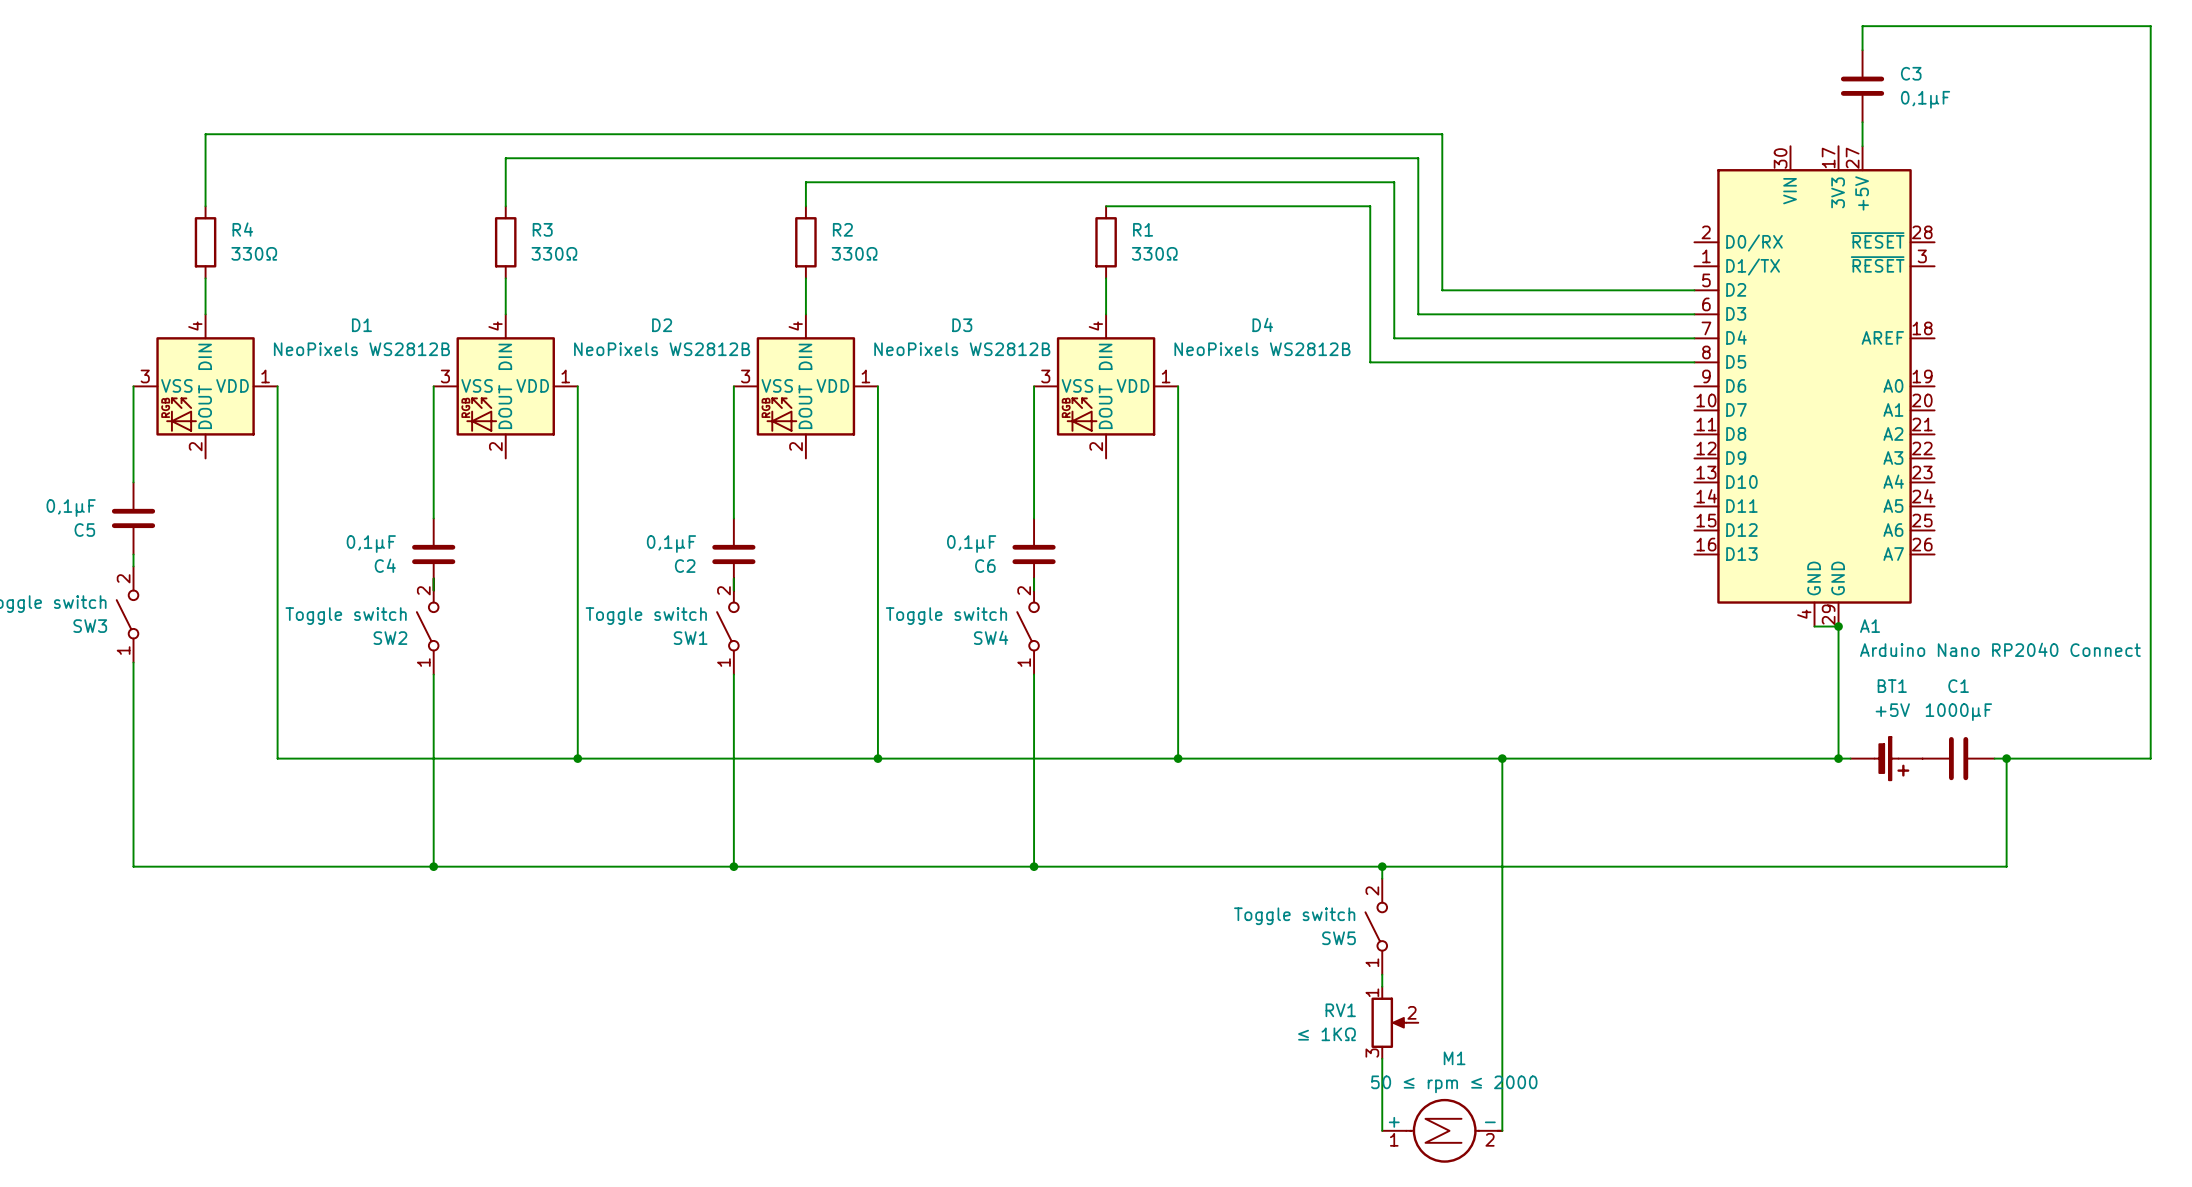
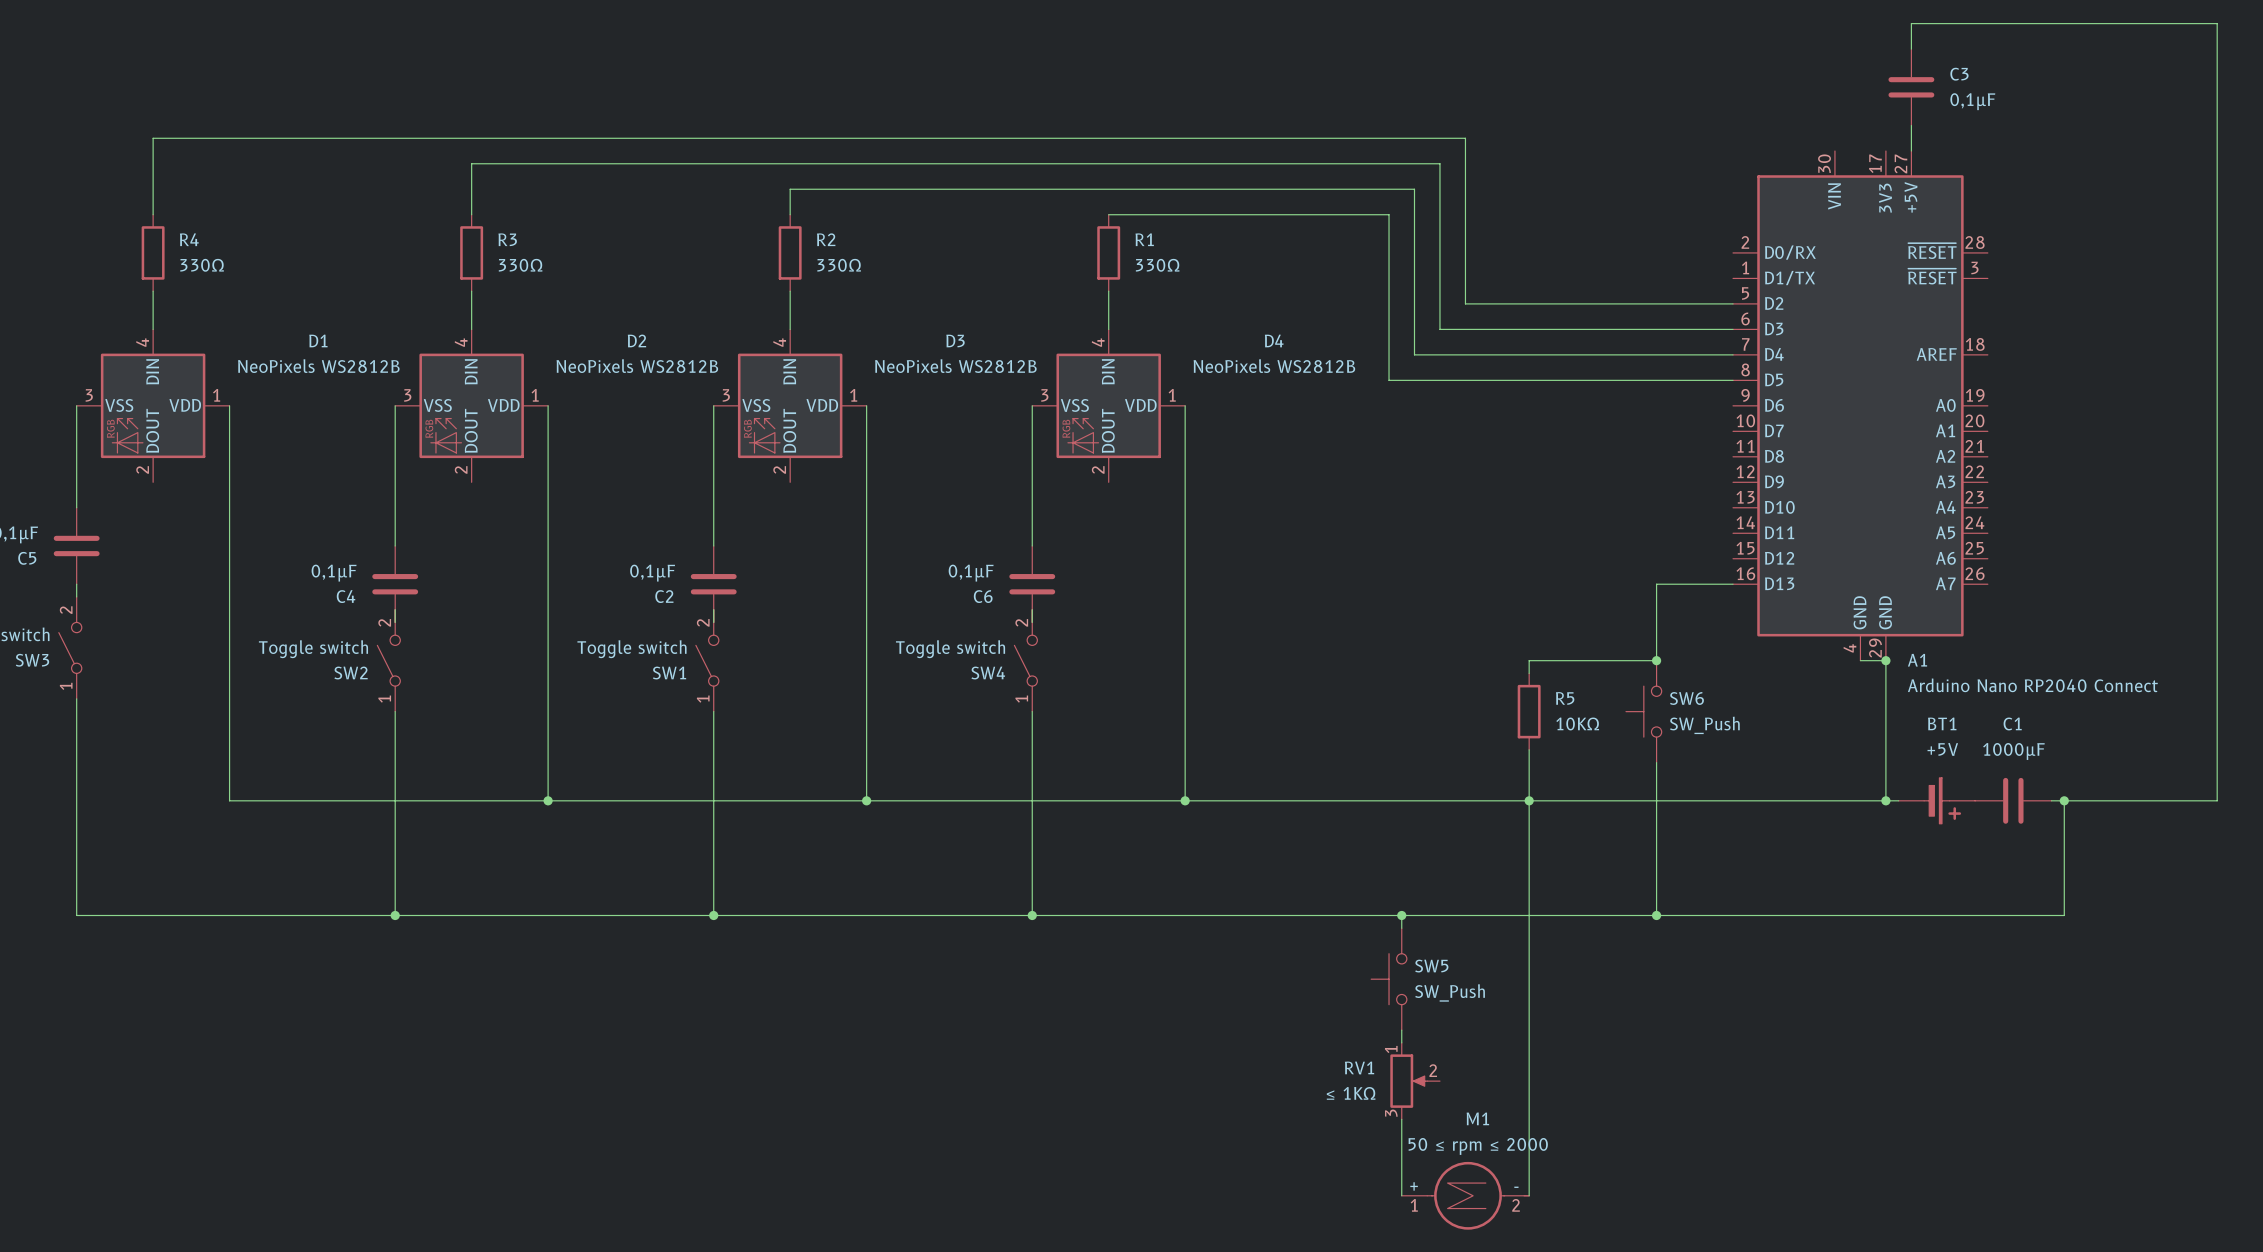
wire: none -> (1733, 584) (1656, 584) (1656, 660) (1529, 660) (1529, 673)
junction: none -> (1656, 660)
R5: none -> 10KΩ (1529, 711)
SW6: none -> SW_Push (1643, 711)
wire: none -> (1529, 749) (1529, 800)
wire: none -> (1656, 762) (1656, 915)
junction: none -> (1656, 915)
SW5 symbol: [1365, 878, 1388, 975] -> [1371, 928, 1407, 1031]
SW5 value: Toggle switch (1294, 916) -> SW_Push (1450, 992)
SW5 name position: SW5 (1338, 938) -> SW5 (1431, 966)

